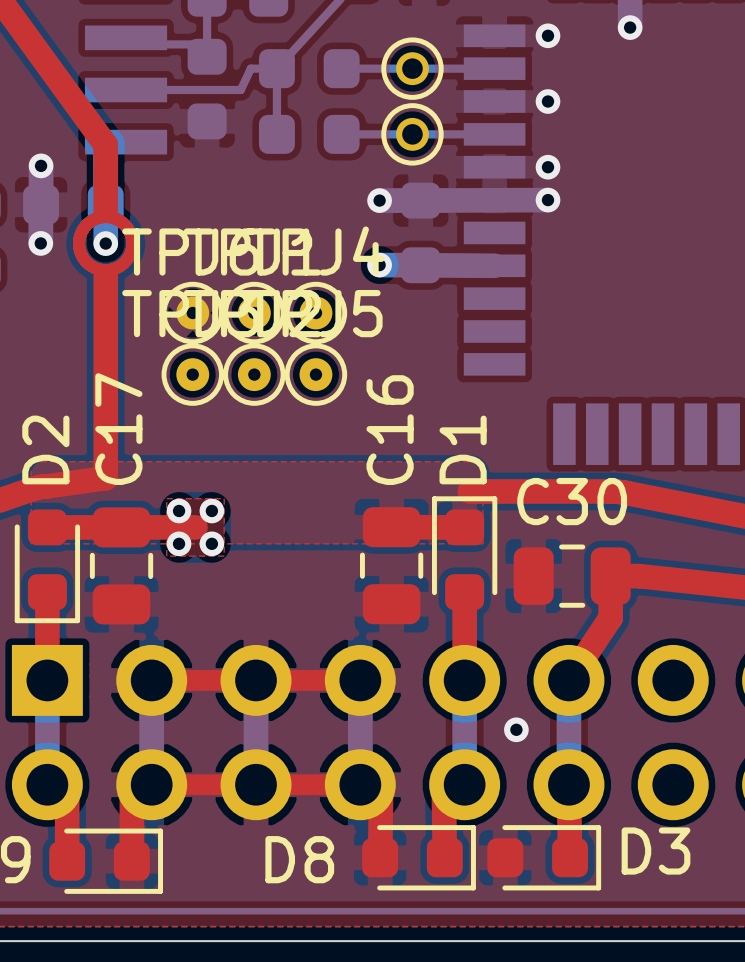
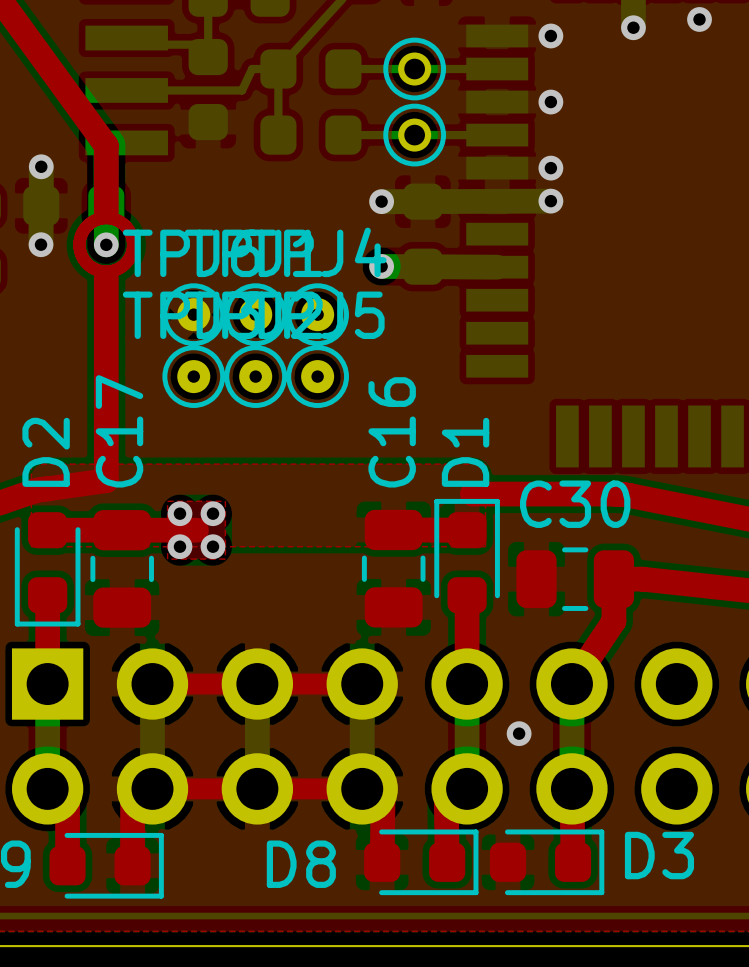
via: none -> (699, 19)

